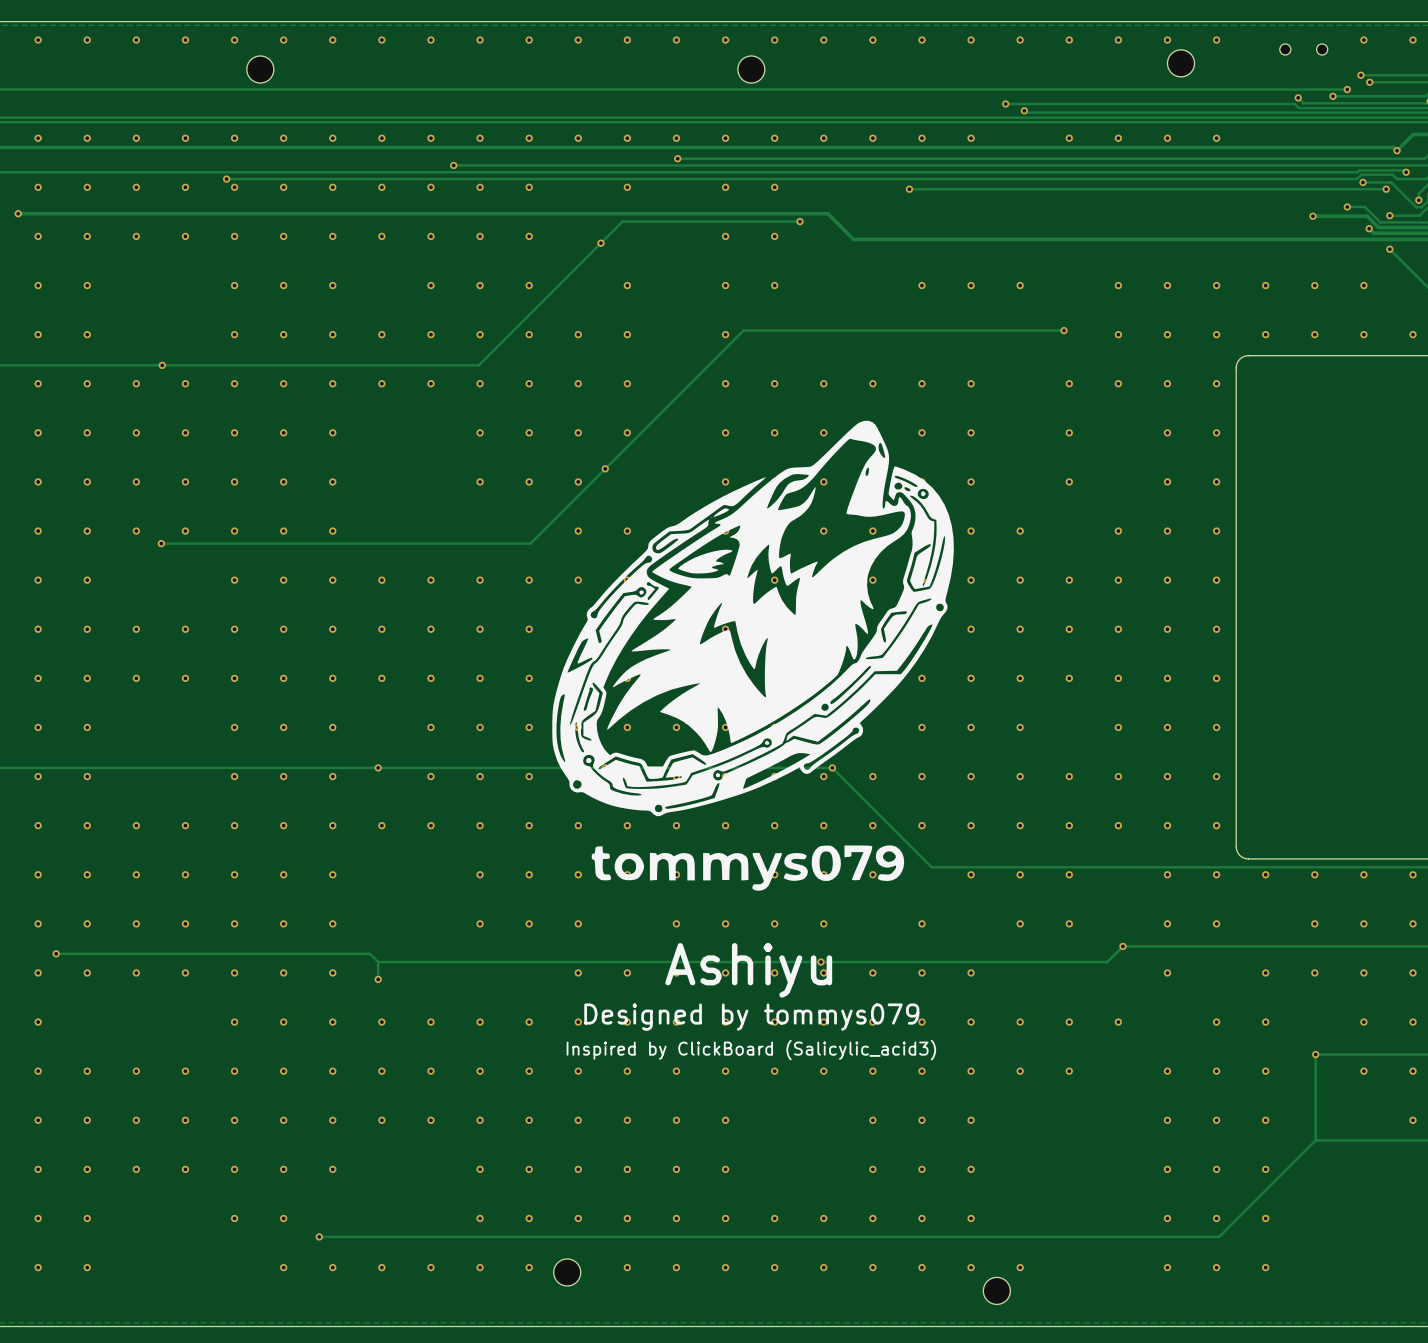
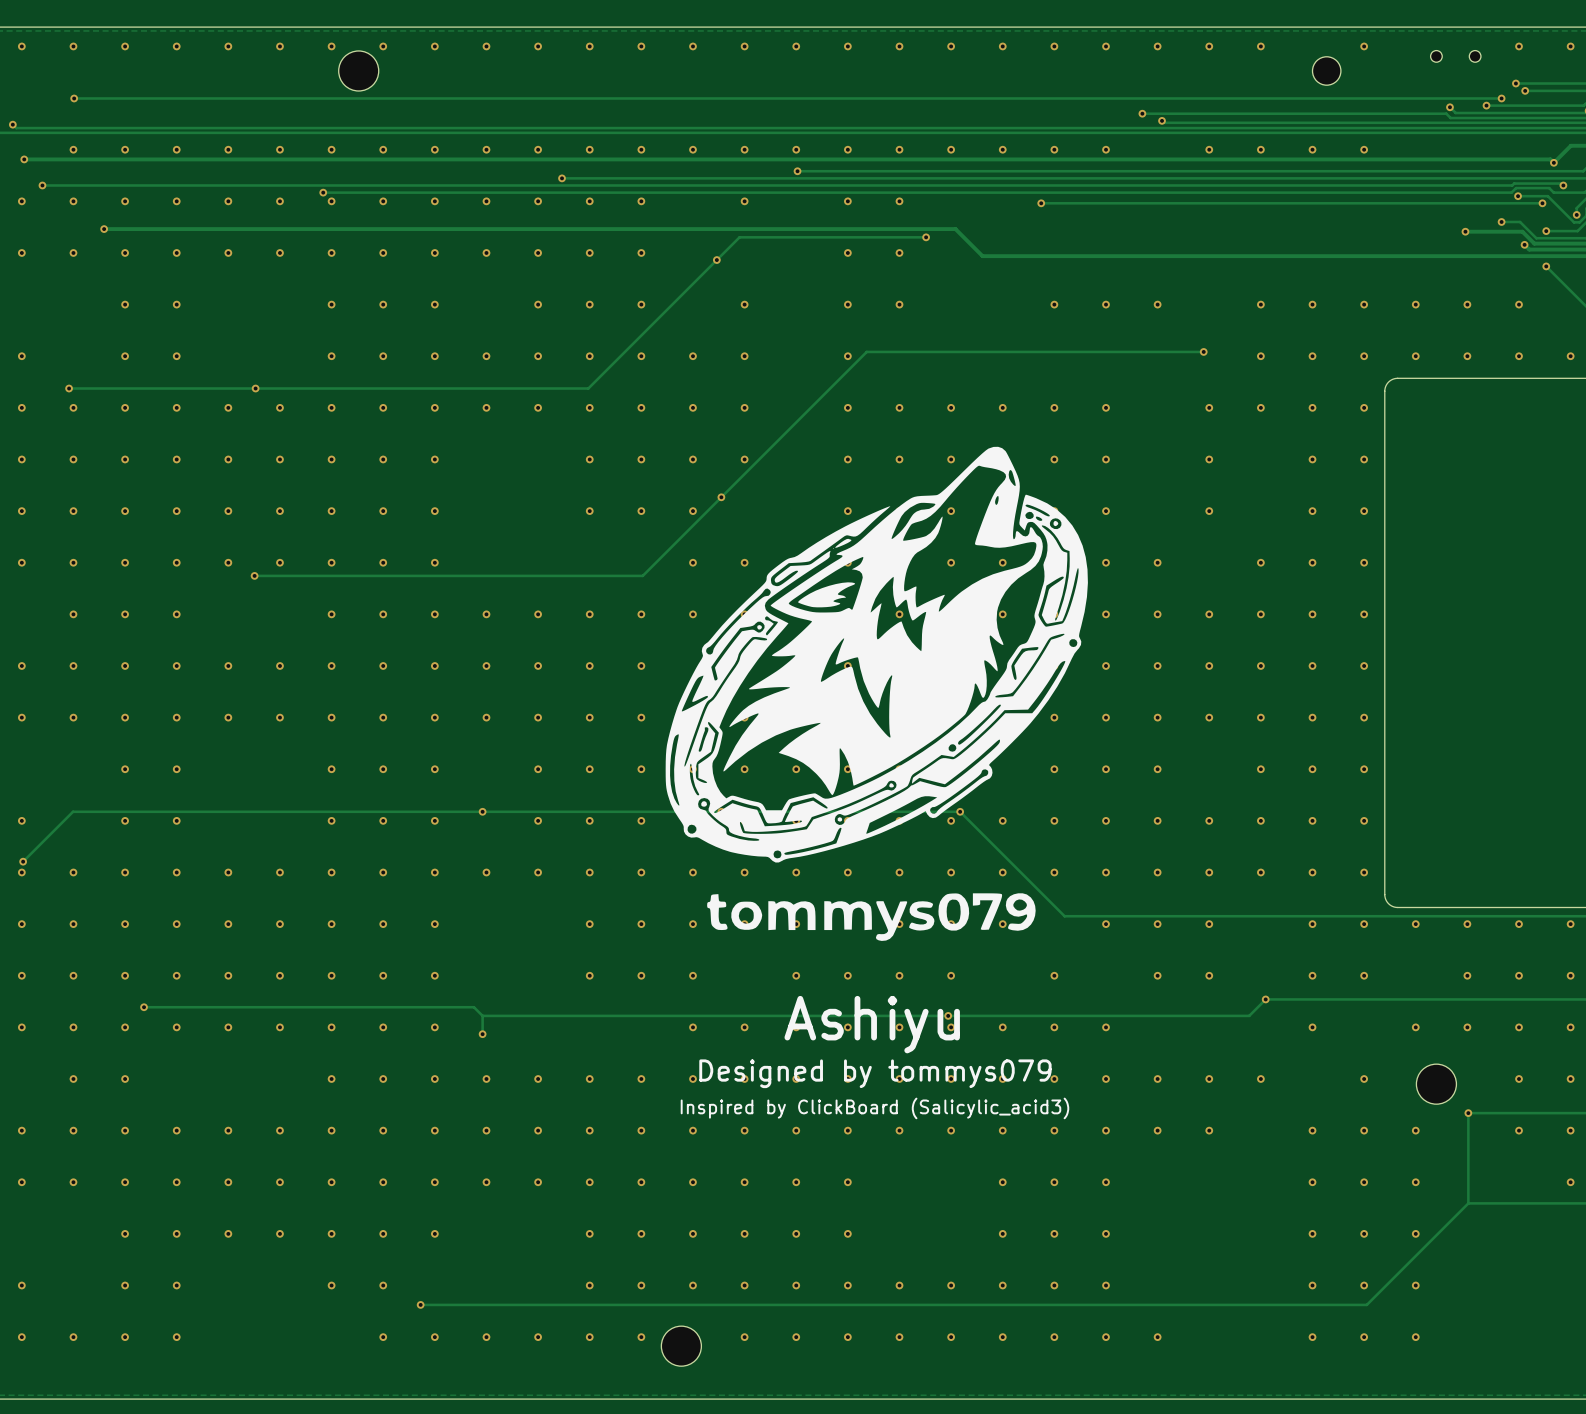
via: (1167, 40) -> none
part footprint: [246, 55, 274, 84] -> [338, 50, 379, 91]
part: (751, 69) -> none
via: (1265, 1022) -> none
part: none -> (1436, 1084)
part footprint: [553, 1258, 581, 1286] -> [661, 1326, 702, 1367]
part: (996, 1290) -> none

